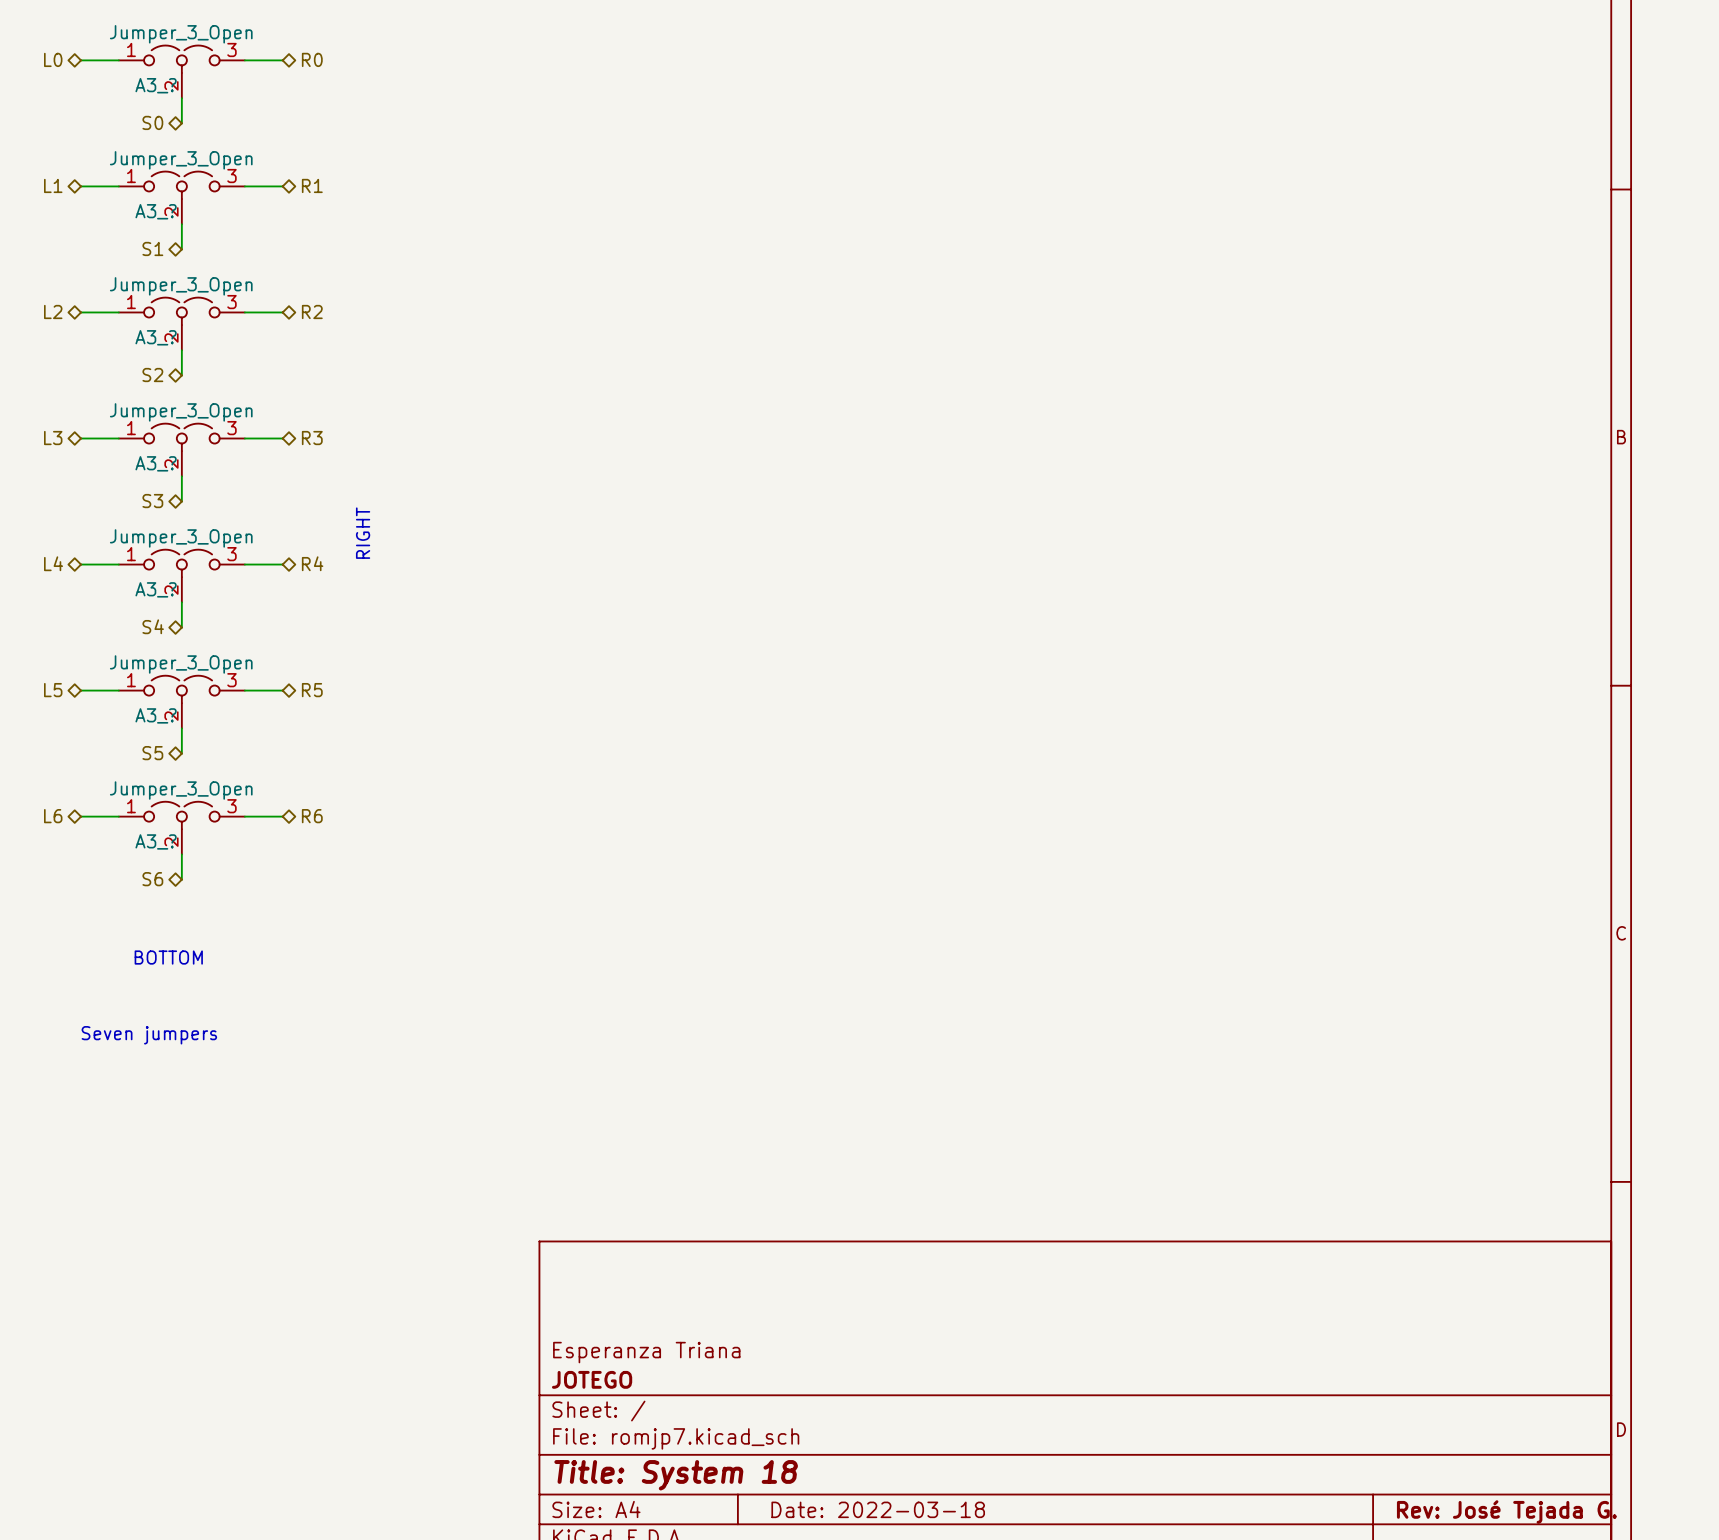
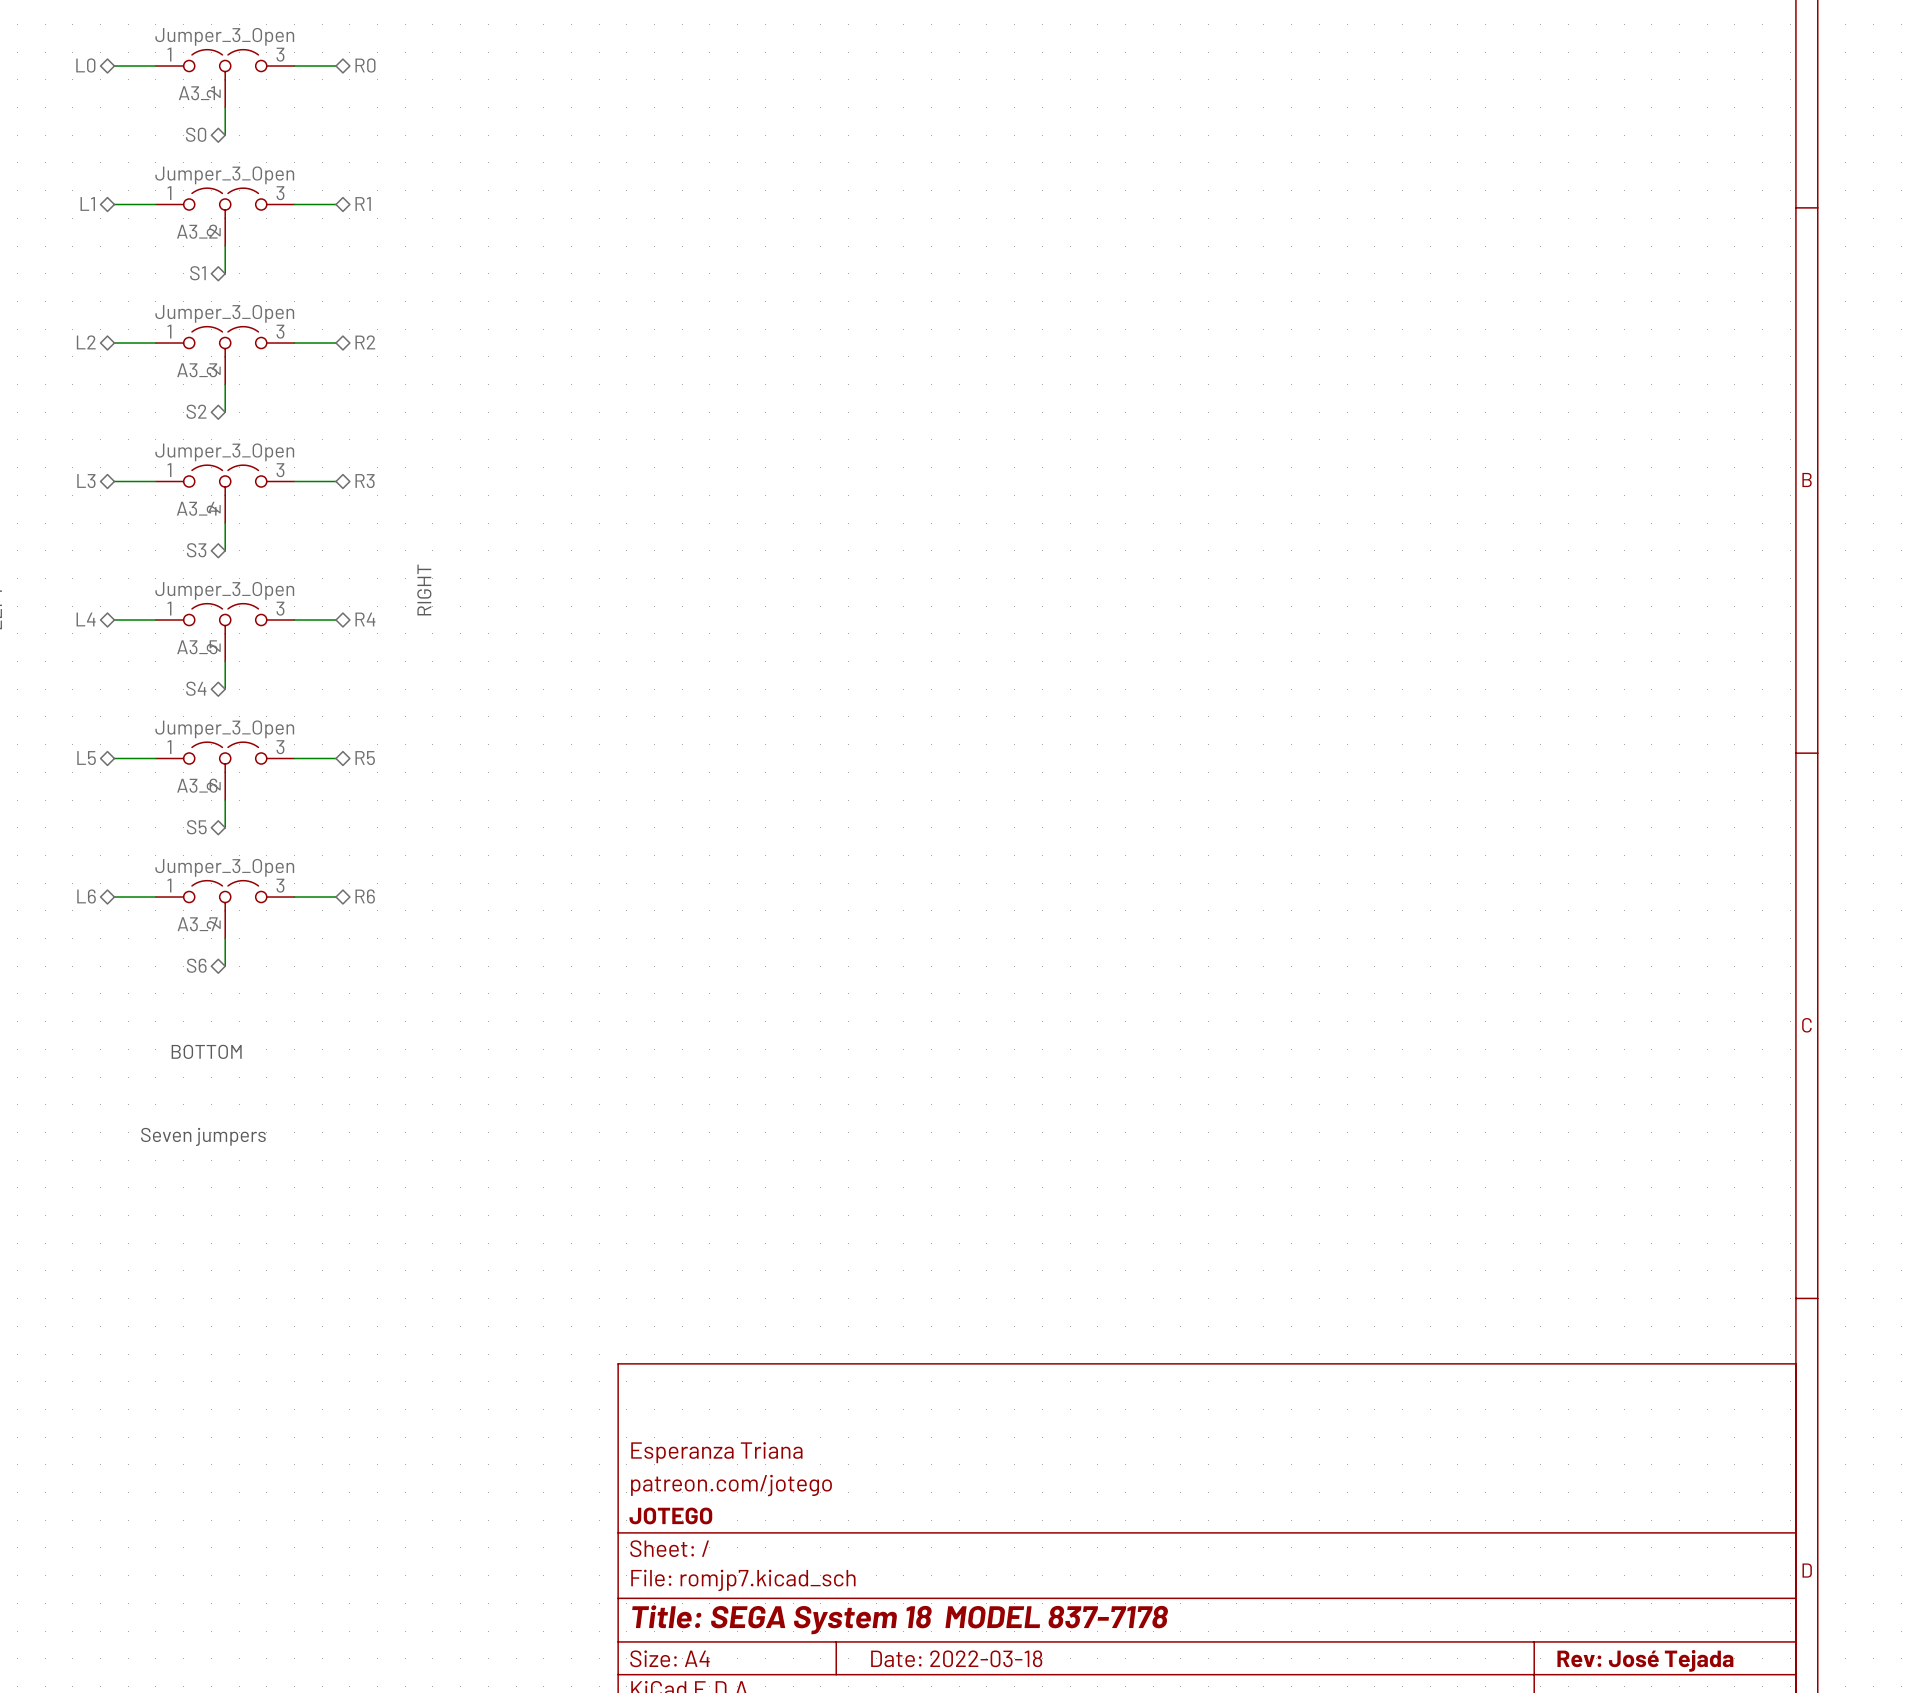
A3_? name: A3_? (156, 85) -> A3_1 (196, 93)
A3_? name: A3_? (156, 211) -> A3_2 (197, 231)
A3_? name: A3_? (156, 337) -> A3_3 (197, 370)
A3_? name: A3_? (156, 463) -> A3_4 (197, 508)
A3_? name: A3_? (156, 589) -> A3_5 (197, 647)
A3_? name: A3_? (156, 715) -> A3_6 (197, 785)
A3_? name: A3_? (156, 841) -> A3_7 (197, 924)
title block: none -> Esperanza Triana (716, 1452)
title block: Esperanza Triana (646, 1352) -> patreon.com/jotego (731, 1485)
title block: Title: System 18 (676, 1475) -> Title: SEGA System 18 MODEL 837-7178 (900, 1619)
title block: Rev: José Tejada G. (1506, 1511) -> Rev: José Tejada (1645, 1660)

